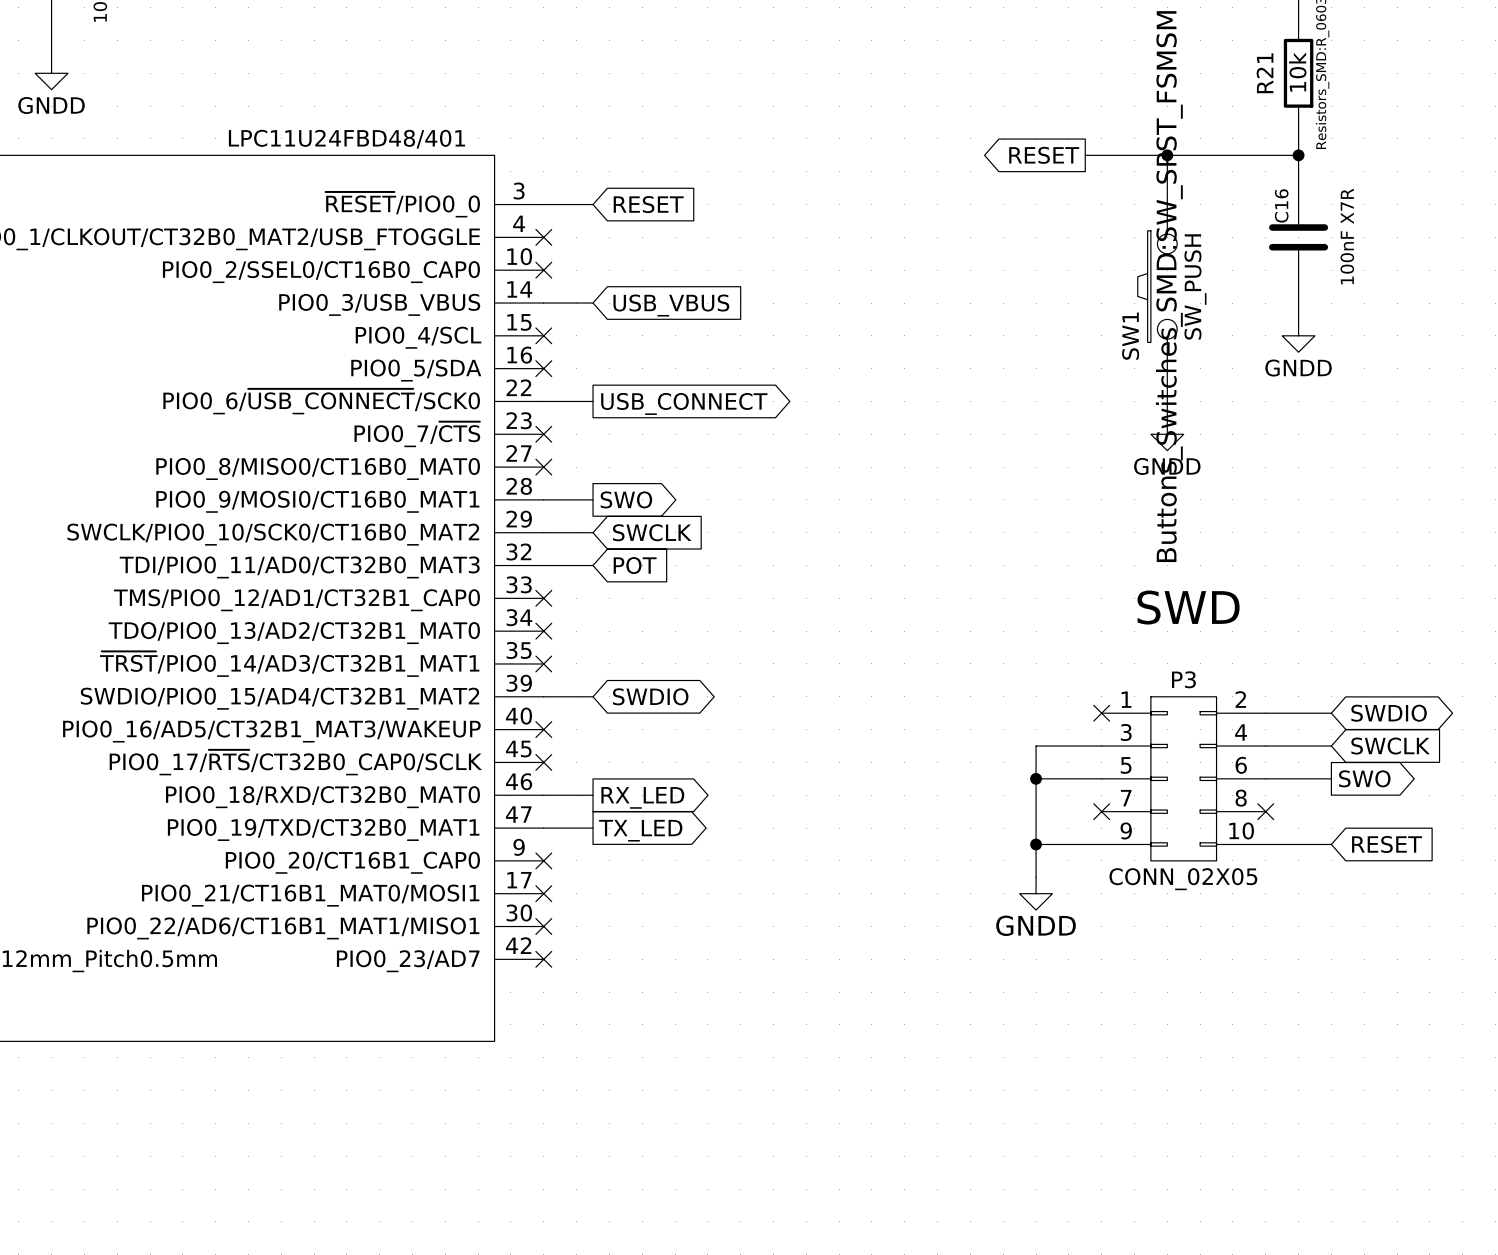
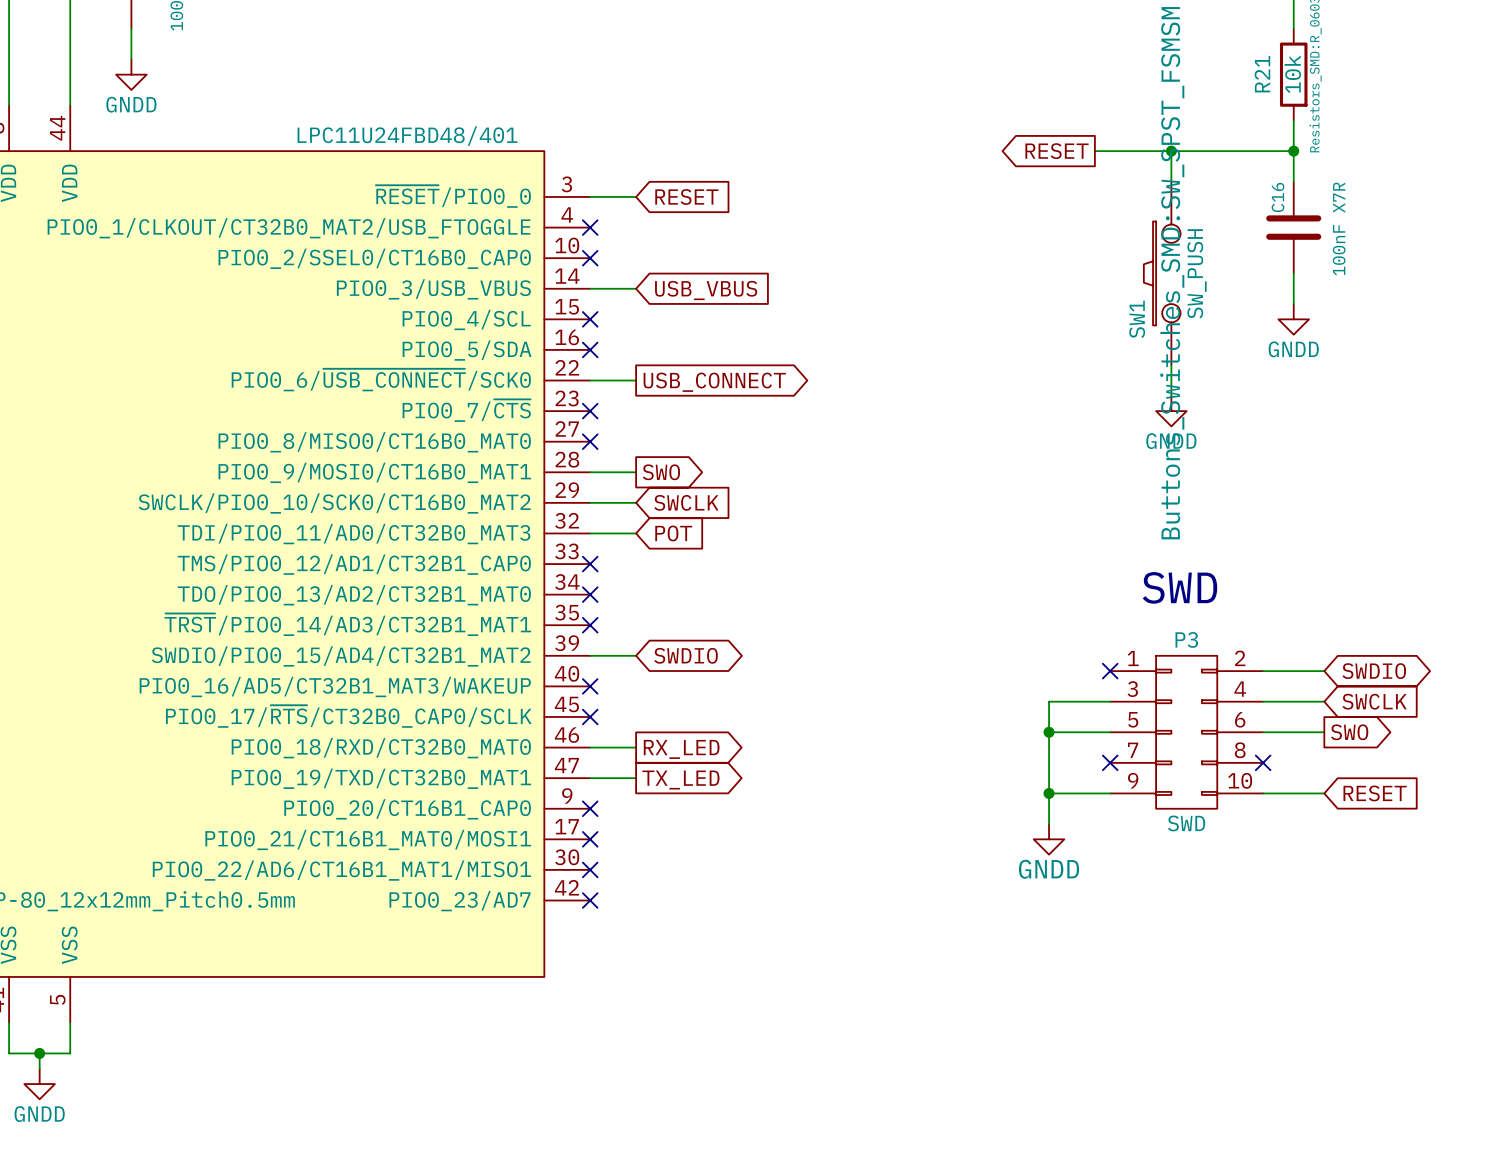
text position: SWD (1188, 607) -> SWD (1179, 587)
P3 value: CONN_02X05 (1183, 879) -> SWD (1186, 823)

